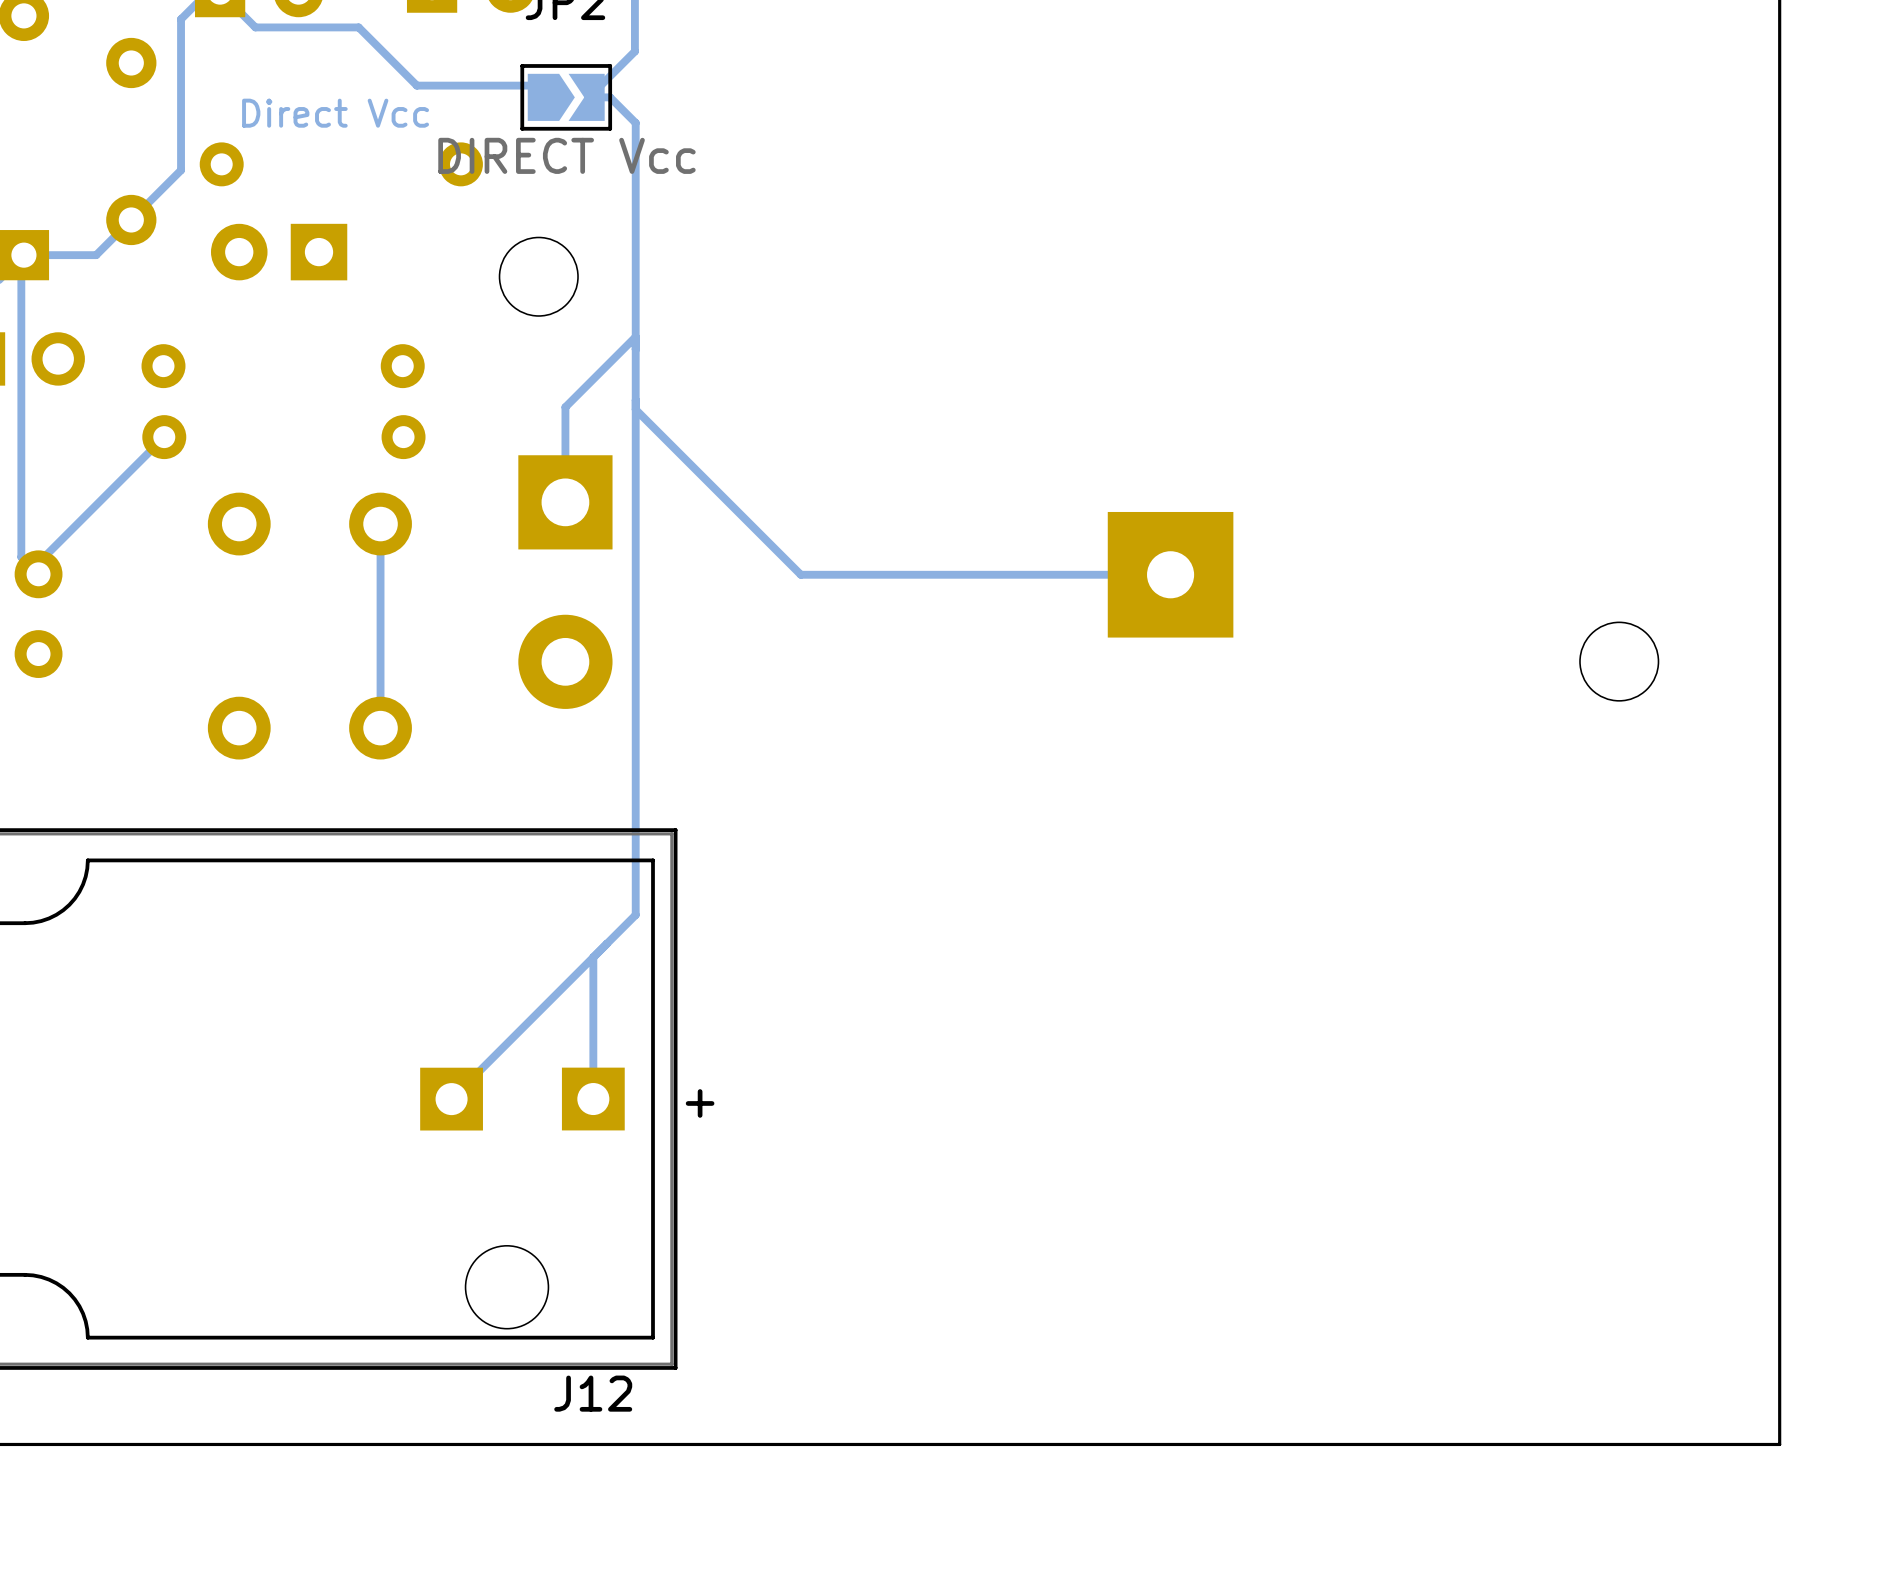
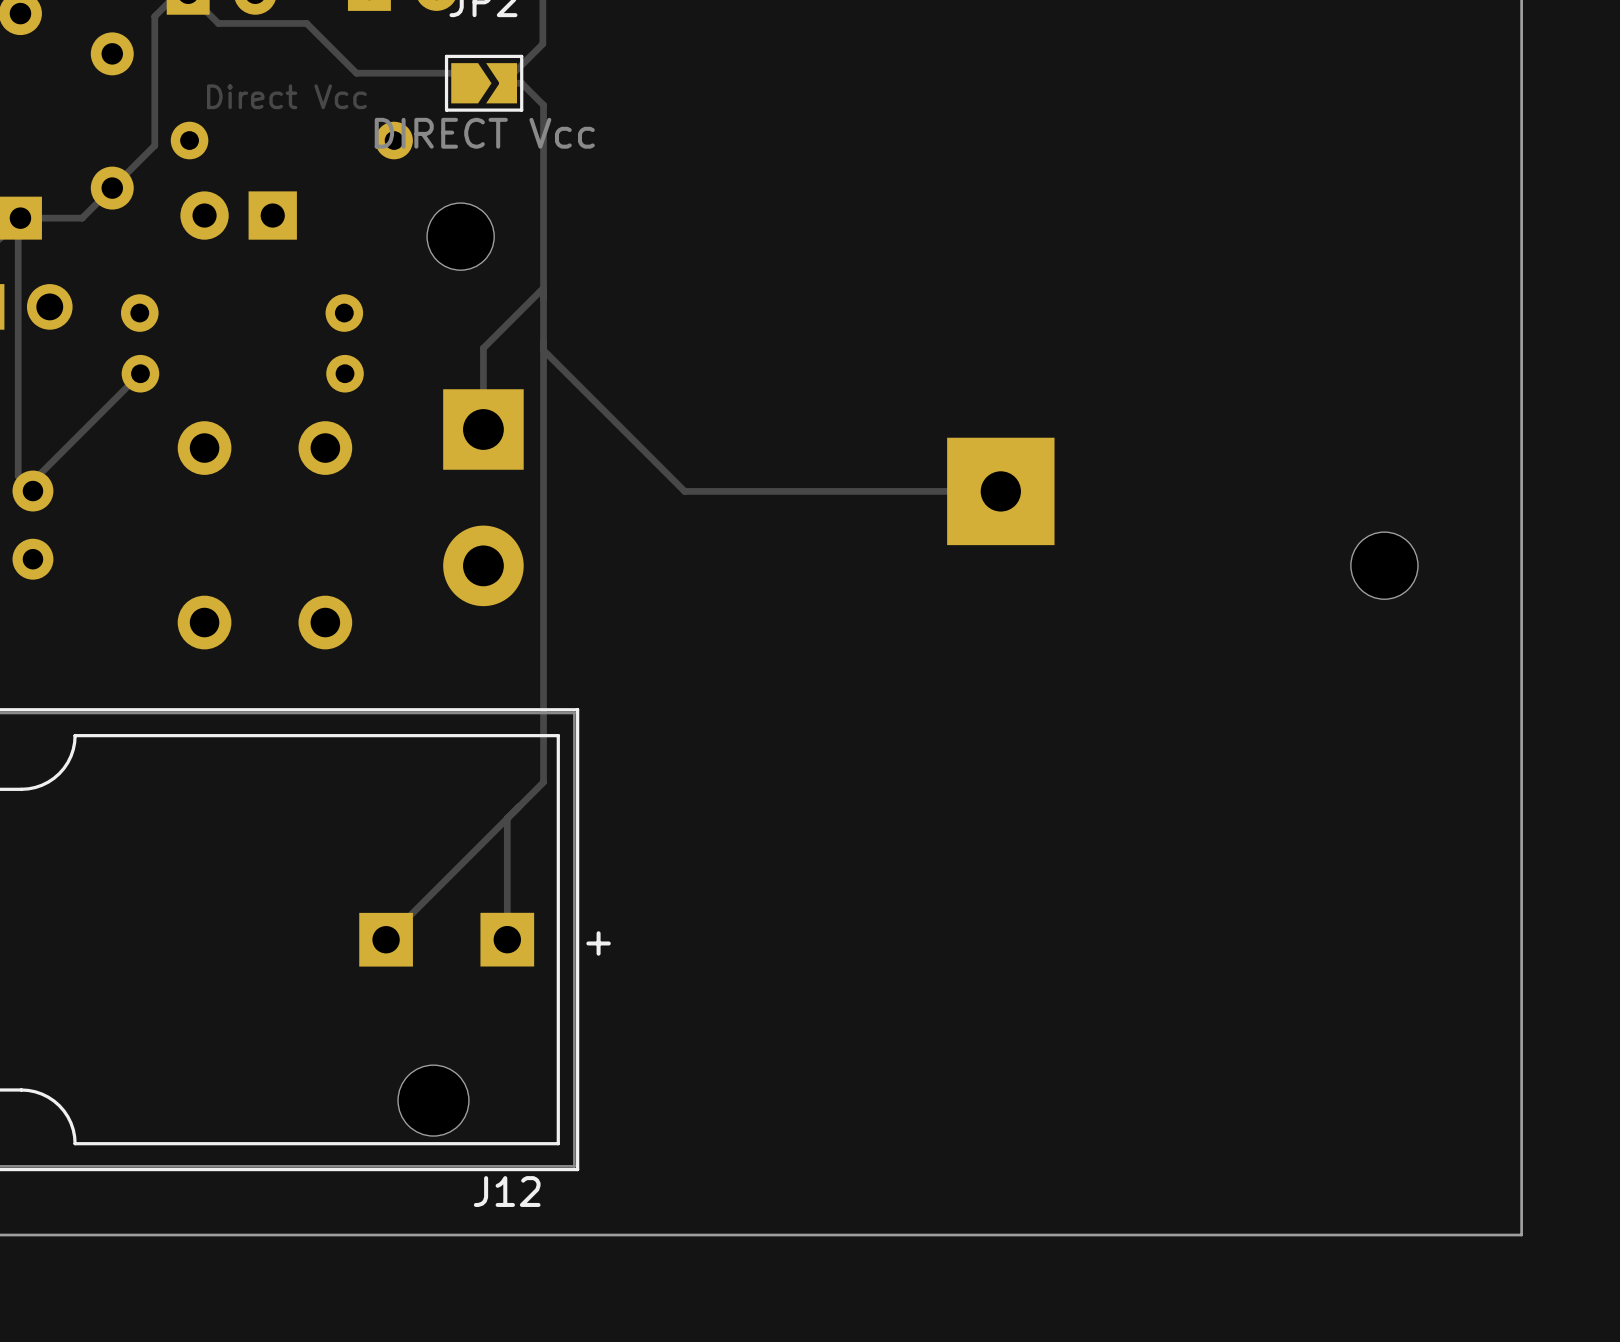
track: (380, 524) (380, 728) -> none

